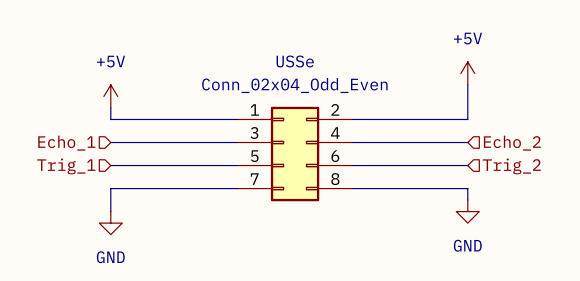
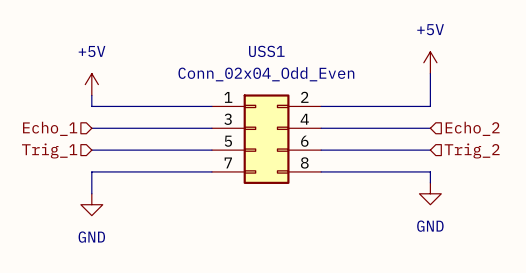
USSe name: USSe (295, 61) -> USS1 (266, 51)

